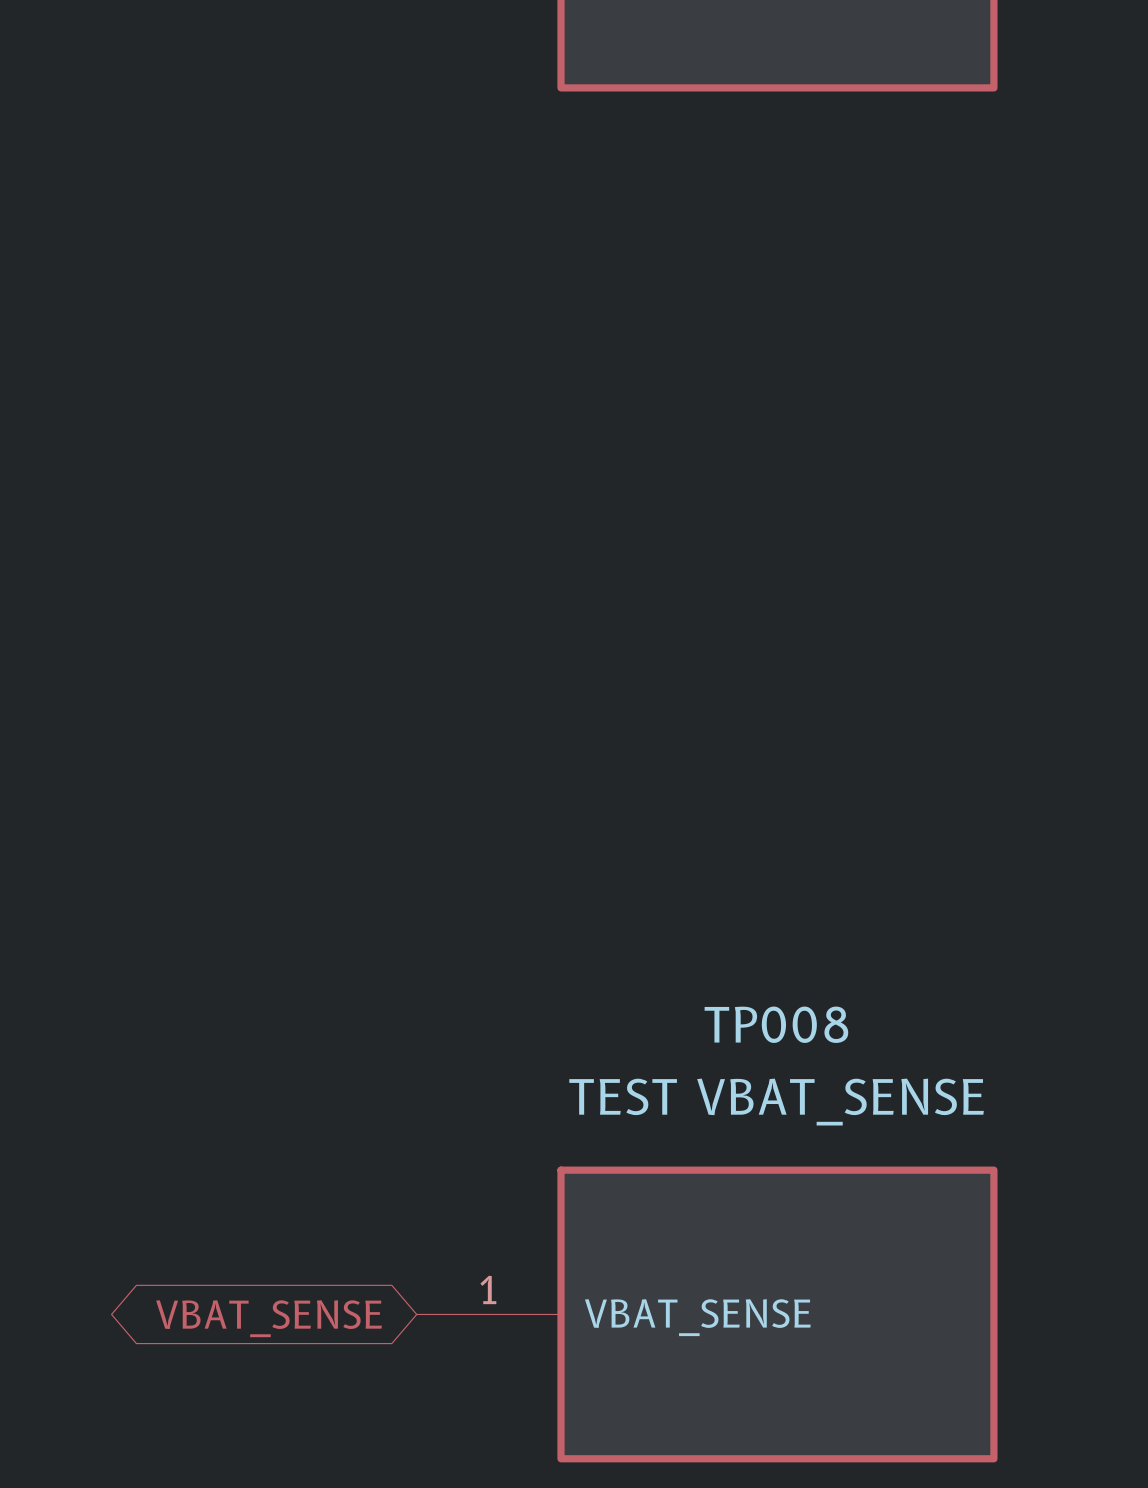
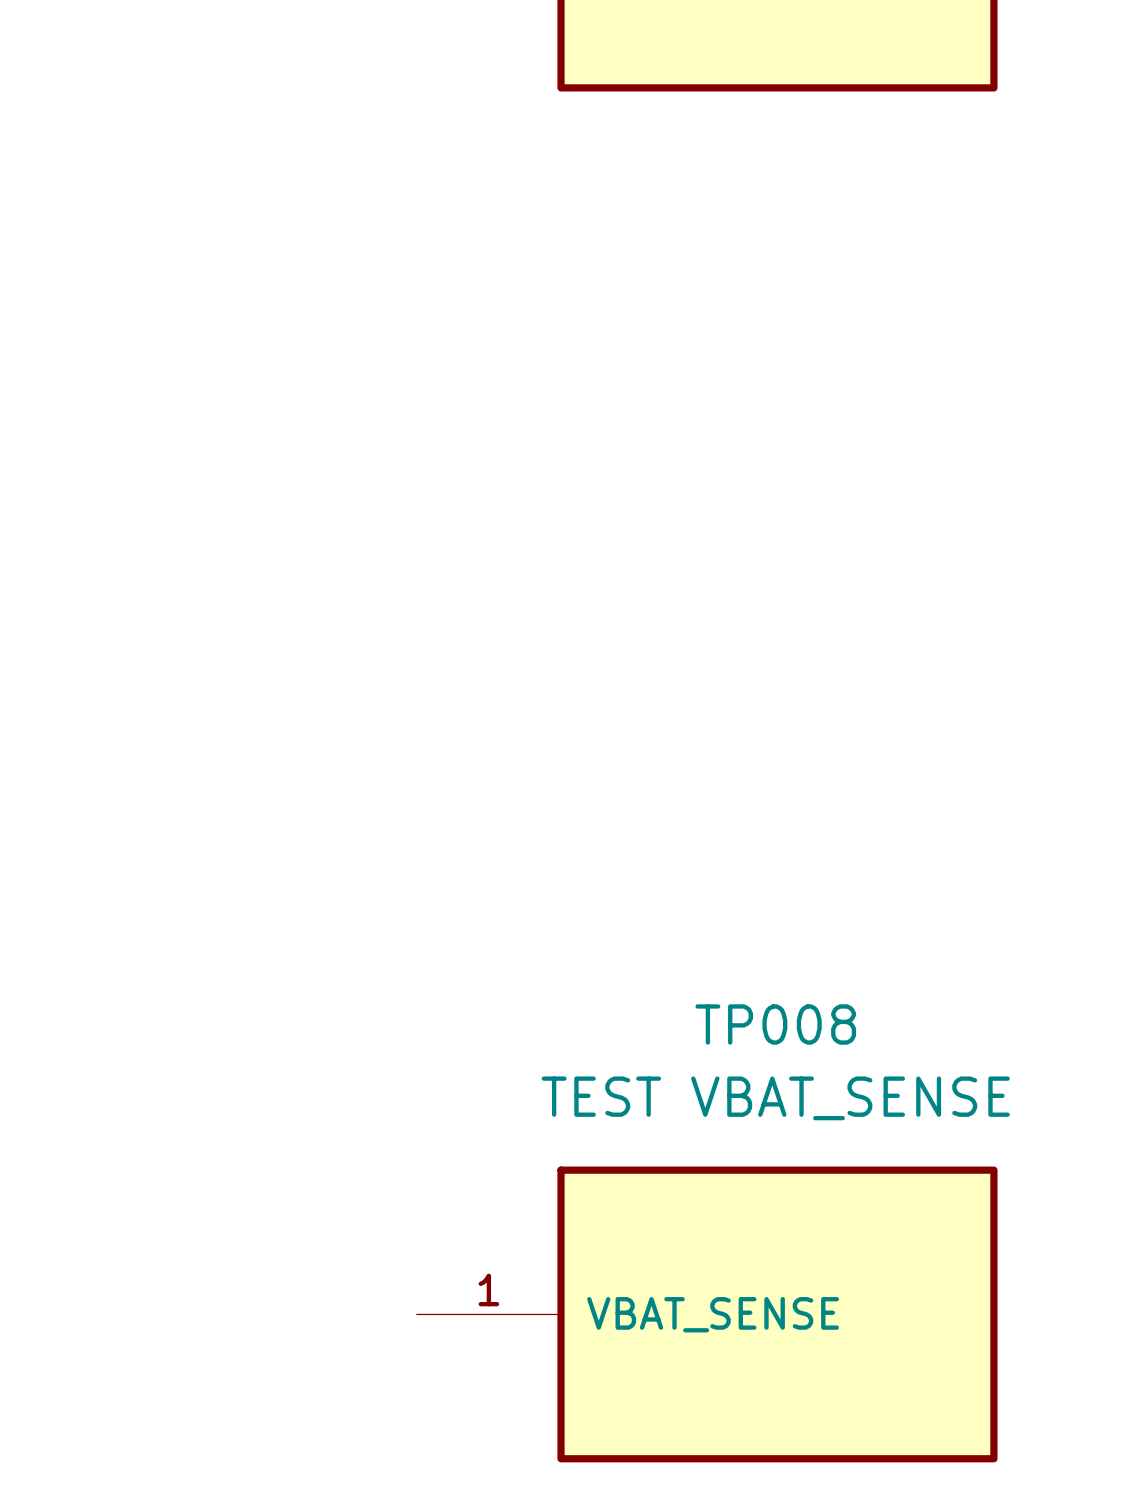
global label: VBAT_SENSE (268, 1318) -> none

